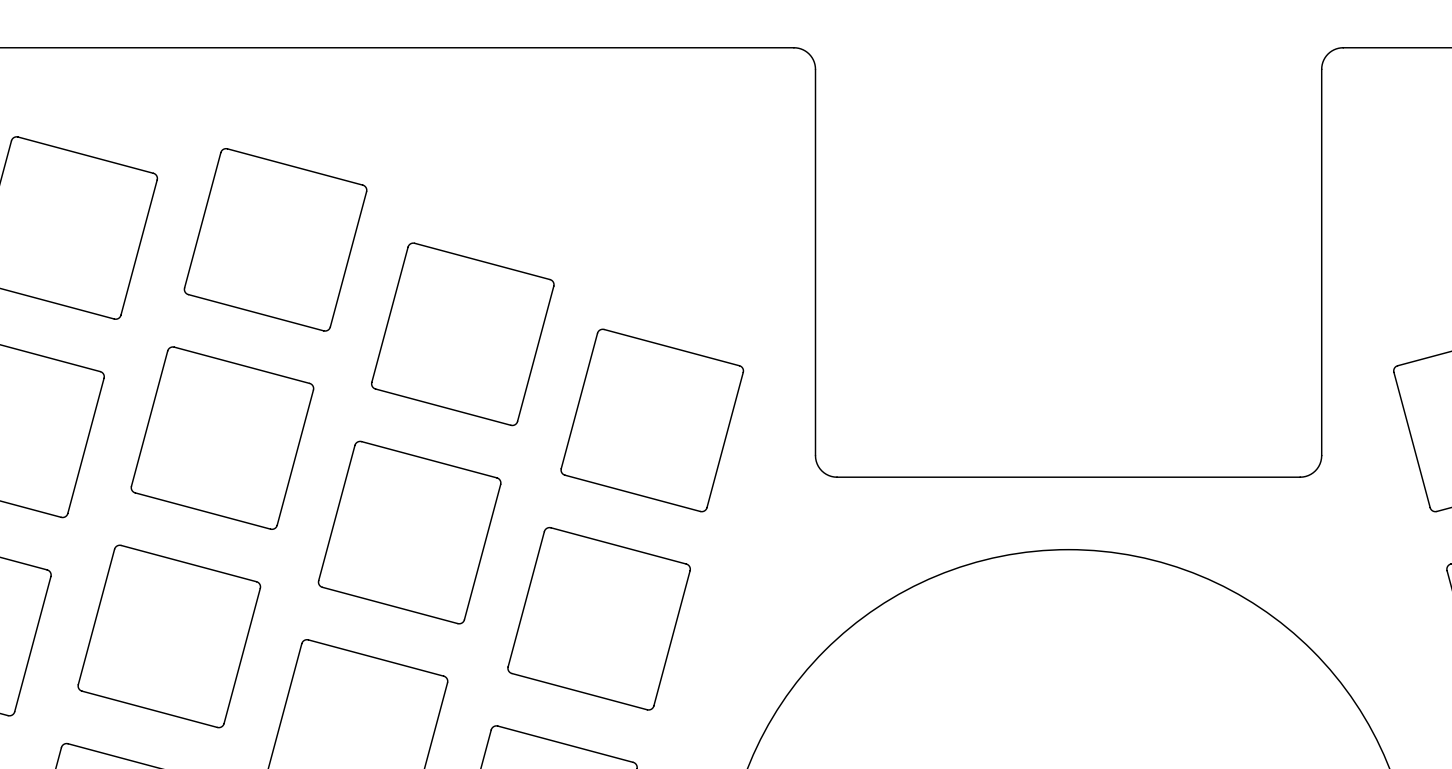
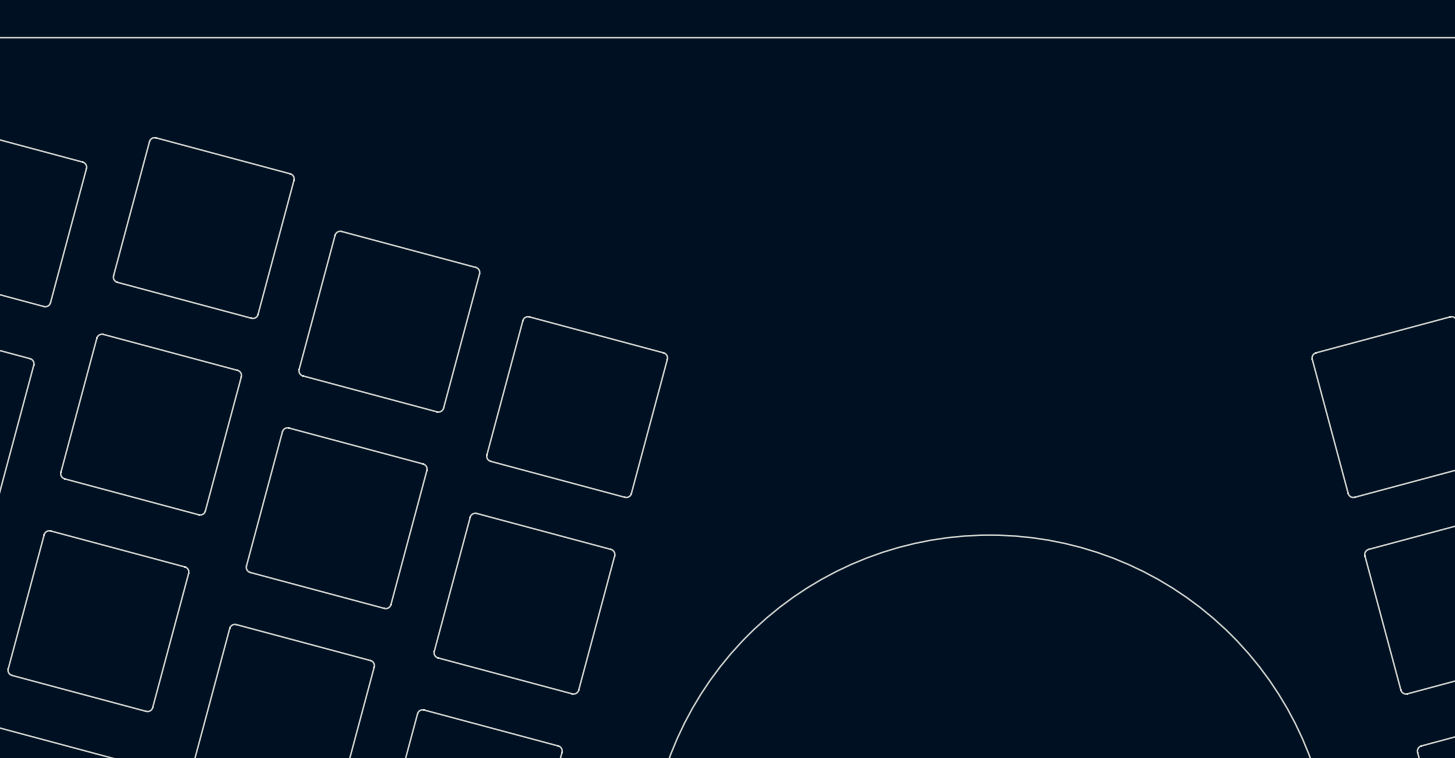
board edge: (793, 47) (801, 48) (809, 54) (815, 66) (815, 455) (817, 463) (821, 470) (828, 475) (837, 477) (1300, 477) (1313, 472) (1320, 463) (1321, 455) (1321, 66) (1328, 54) (1333, 49) (1343, 47) -> (717, 37) (1262, 37)

